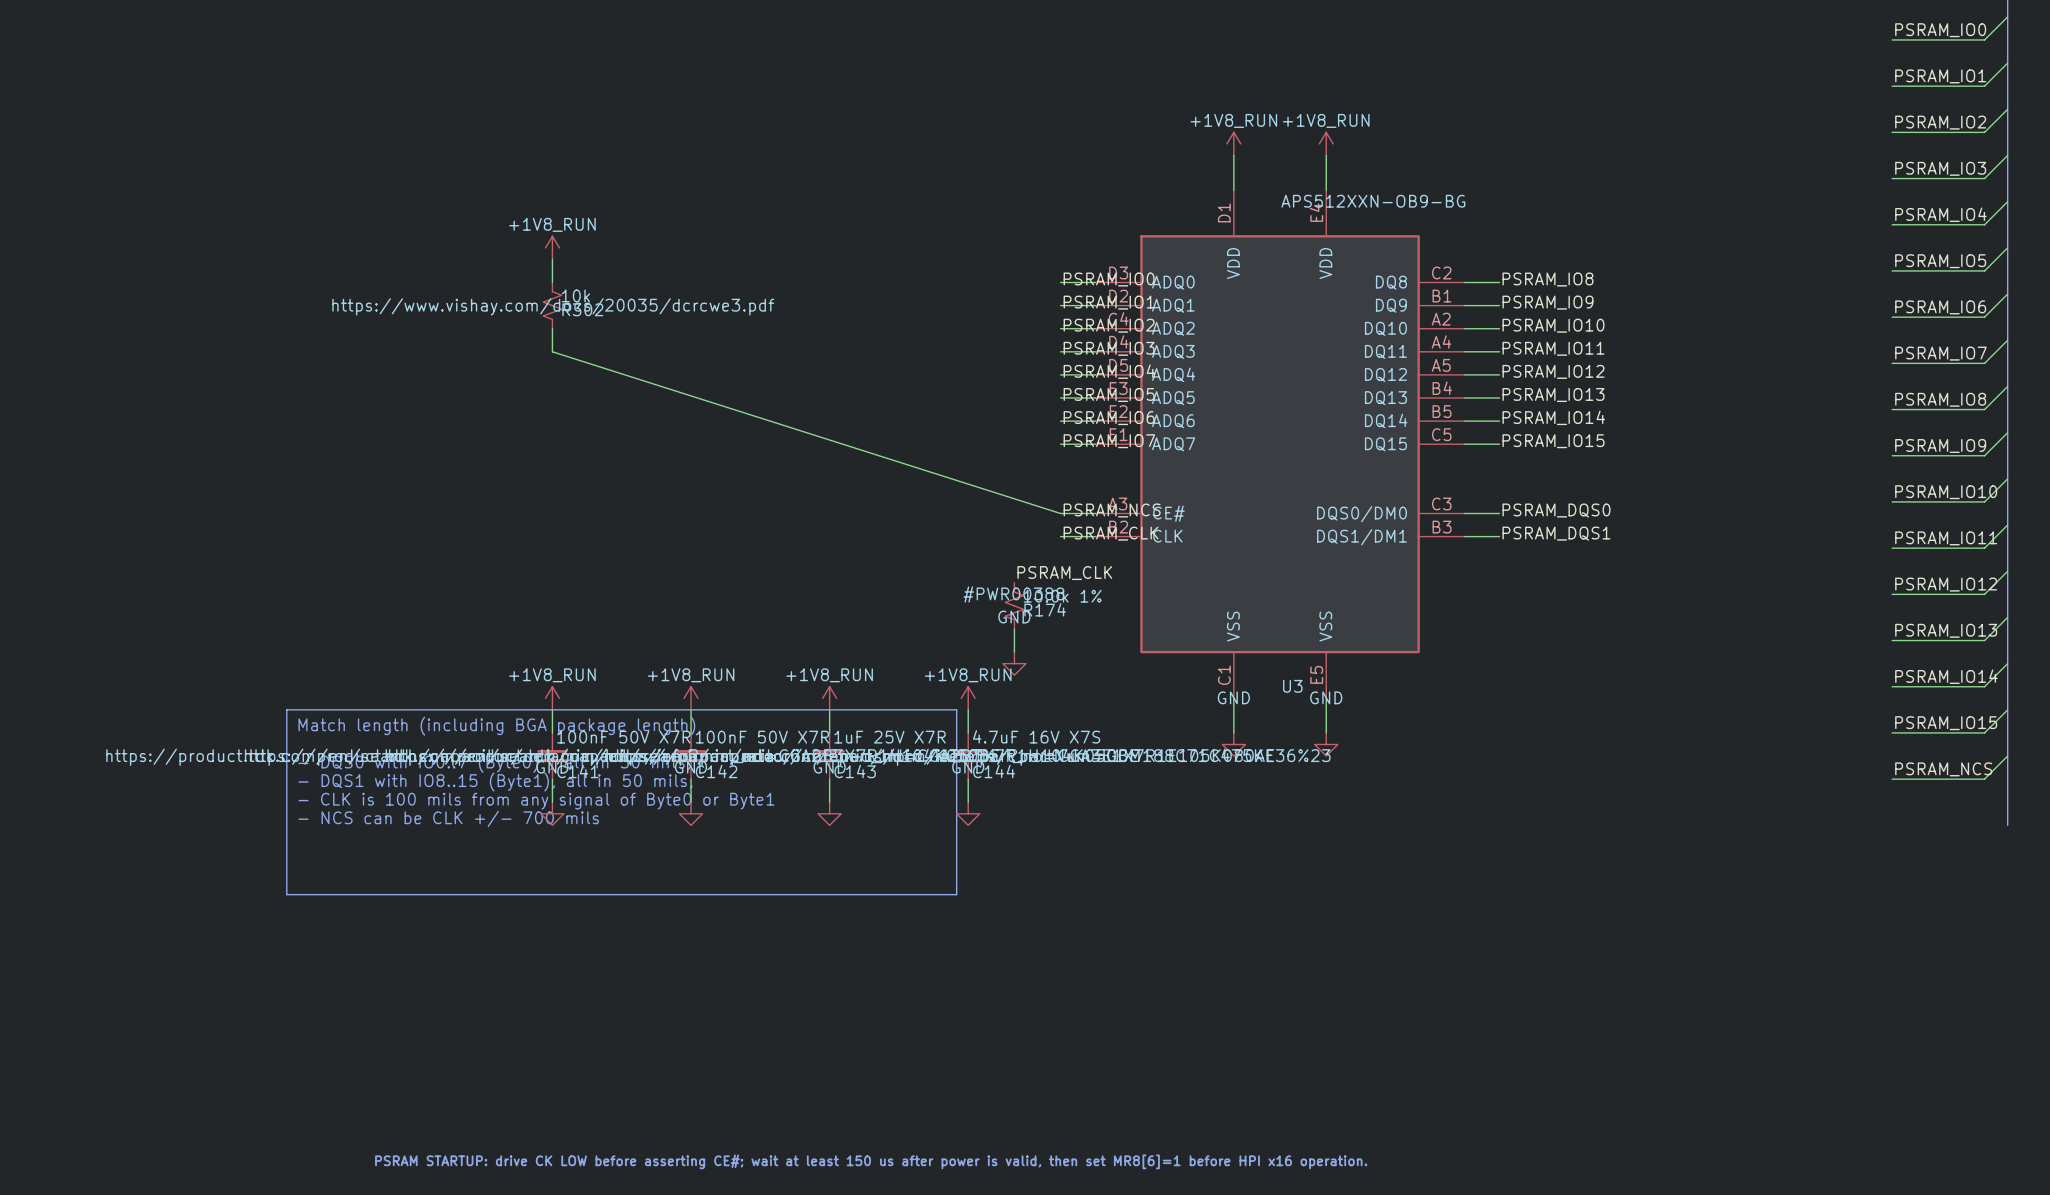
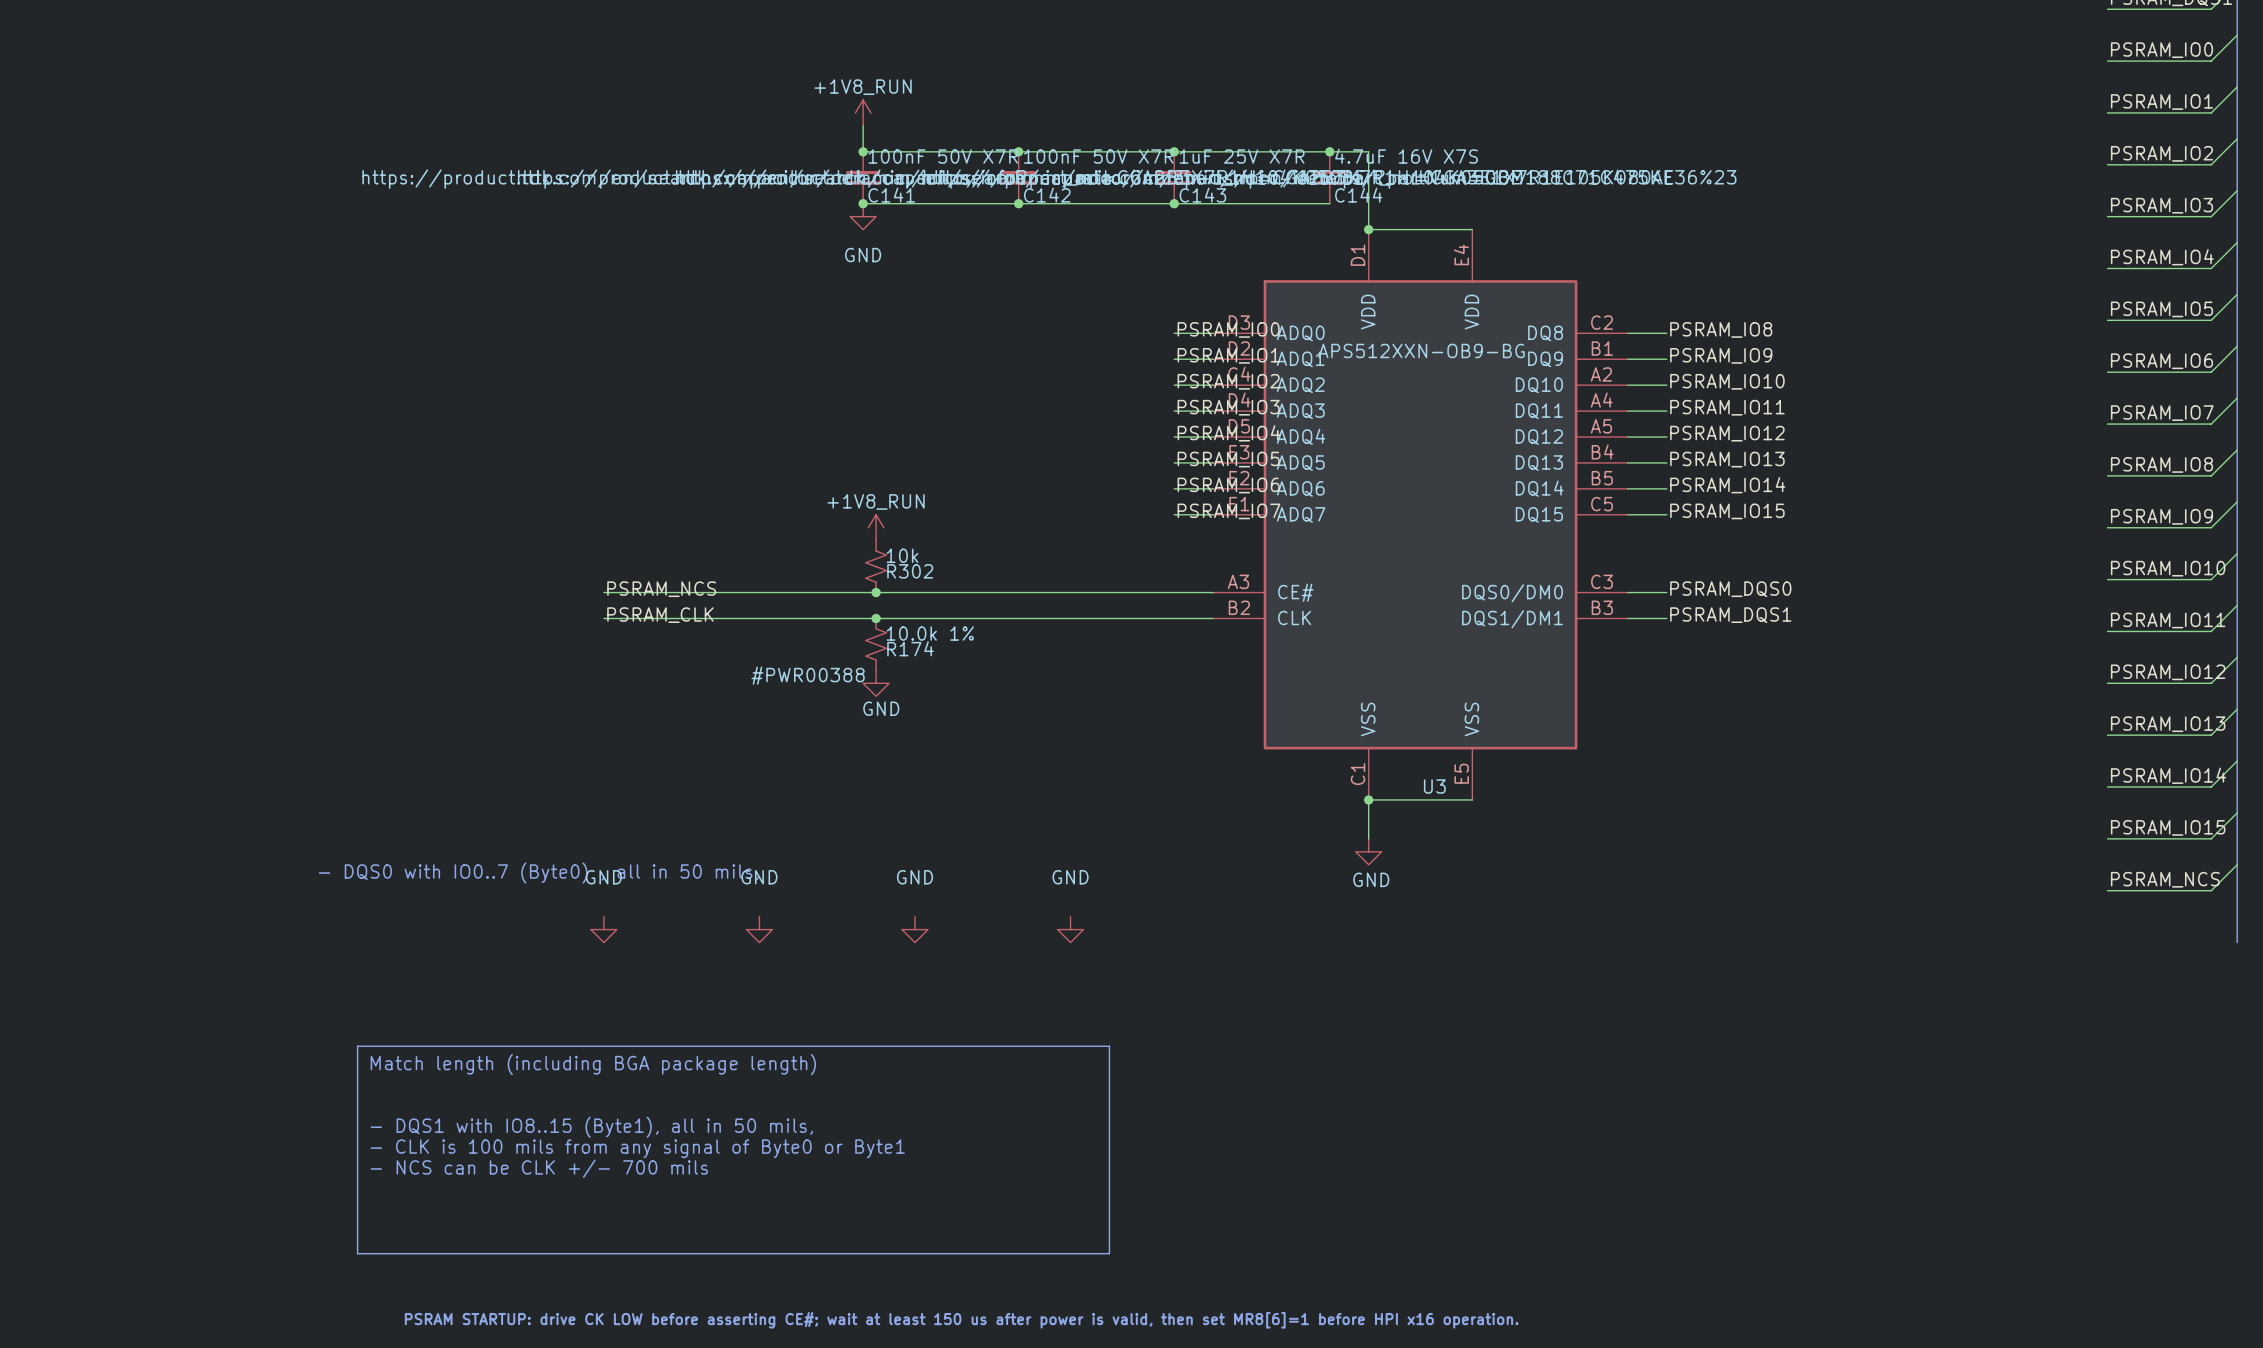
power symbol: none -> +1V8_RUN (863, 112)
wire: none -> (863, 125) (863, 151) (1368, 151) (1368, 190)
junction: none -> (863, 151)
junction: none -> (1018, 151)
junction: none -> (1174, 151)
junction: none -> (1329, 151)
power symbol: +1V8_RUN (1233, 143) -> none
power symbol: +1V8_RUN (1326, 143) -> none
wire: (1326, 155) (1326, 190) -> (1368, 229) (1472, 229)
wire: none -> (863, 203) (1329, 203)
junction: none -> (863, 203)
junction: none -> (1018, 203)
junction: none -> (1174, 203)
power symbol: none -> GND (863, 216)
junction: none -> (1368, 229)
U3 value position: APS512XXN-OB9-BG (1373, 201) -> APS512XXN-OB9-BG (1421, 350)
power symbol: +1V8_RUN (552, 247) -> none
wire: (552, 259) (552, 282) -> none
R302 position: (552, 305) -> (876, 566)
R302 text: https://www.vishay.com/docs/20035/dcrcwe3.pdf (553, 306) -> none
wire: (552, 328) (552, 351) (1060, 513) -> (603, 592) (1174, 592)
power symbol: none -> +1V8_RUN (876, 527)
label: none -> PSRAM_NCS (661, 589)
label: PSRAM_NCS (1112, 510) -> none
junction: none -> (876, 592)
label: none -> PSRAM_CLK (660, 615)
label: PSRAM_CLK (1111, 533) -> none
wire: none -> (603, 618) (1174, 618)
junction: none -> (876, 618)
label: PSRAM_CLK (1064, 573) -> none
#PWR00388 name position: #PWR00388 (1013, 594) -> #PWR00388 (808, 675)
R174 position: (1014, 605) -> (876, 644)
#PWR00388 text position: GND (1014, 617) -> GND (881, 708)
wire: (1014, 629) (1014, 652) -> none
#PWR00388 position: GND (1014, 663) -> GND (876, 683)
power symbol text position: GND (1233, 697) -> GND (1371, 879)
power symbol: +1V8_RUN (552, 698) -> none
power symbol: +1V8_RUN (691, 698) -> none
power symbol: +1V8_RUN (829, 698) -> none
power symbol: +1V8_RUN (968, 698) -> none
junction: none -> (1368, 799)
wire: (1326, 698) (1326, 732) -> (1472, 799) (1368, 799)
line: (286, 709) (956, 709) (956, 894) (286, 894) (286, 709) -> (357, 1046) (1109, 1046) (1109, 1253) (357, 1253) (357, 1046)
wire: (552, 709) (552, 732) -> none
wire: (691, 709) (691, 732) -> none
wire: (829, 709) (829, 732) -> none
wire: (968, 709) (968, 732) -> none
text position: Match length (including BGA package length) (496, 726) -> Match length (including BGA package length) (593, 1064)
power symbol: GND (1326, 744) -> none
C141 position: (552, 756) -> (863, 177)
C142 position: (691, 756) -> (1018, 177)
C143 position: (829, 756) -> (1174, 177)
C144 position: (968, 756) -> (1329, 177)
wire: (552, 779) (552, 802) -> none
wire: (691, 779) (691, 802) -> none
wire: (829, 779) (829, 802) -> none
wire: (968, 779) (968, 802) -> none
text position: - DQS1 with IO8..15 (Byte1), all in 50 mils, (495, 781) -> - DQS1 with IO8..15 (Byte1), all in 50 mils, (591, 1127)
text position: - CLK is 100 mils from any signal of Byte0 or Byte1 (536, 801) -> - CLK is 100 mils from any signal of Byte0 or Byte1 (637, 1148)
text position: - NCS can be CLK +/- 700 mils (448, 818) -> - NCS can be CLK +/- 700 mils (539, 1168)

